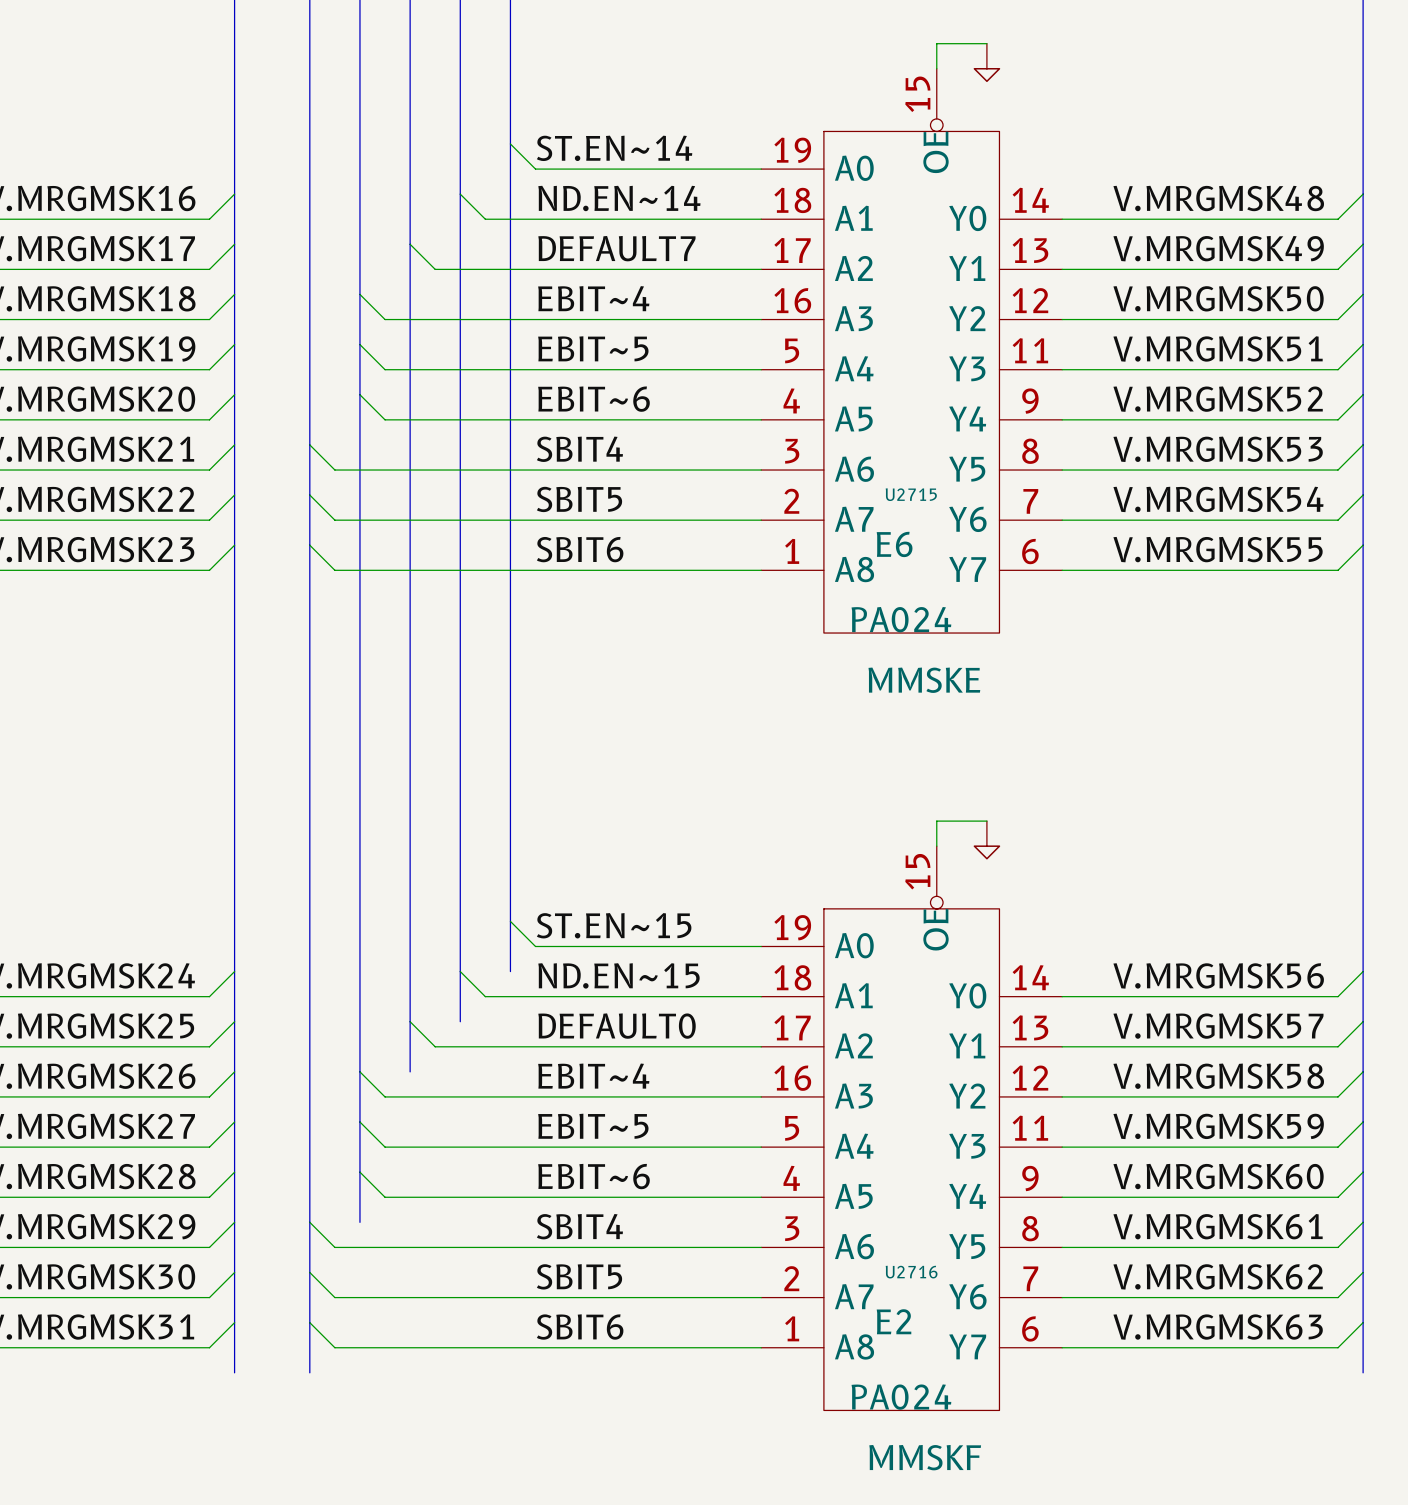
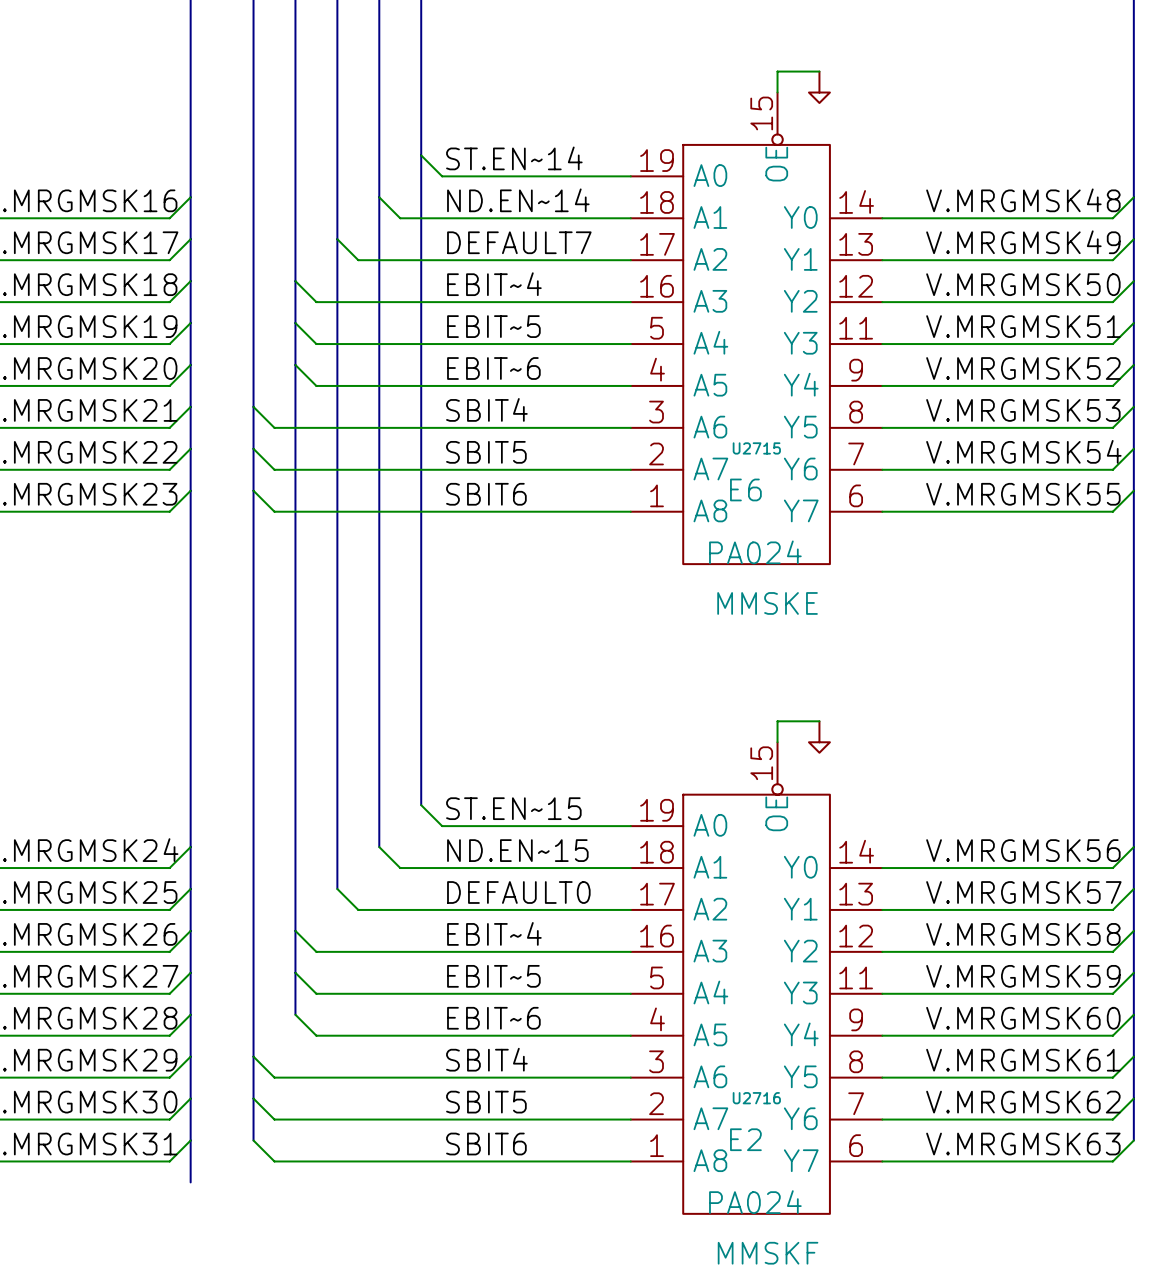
bus: (510, 921) (510, 971) -> none
bus: (460, 971) (460, 1021) -> none
bus: (410, 1021) (410, 1071) -> none
bus: (359, 1172) (359, 1222) -> none
bus: (309, 1322) (309, 1372) -> none
bus: (1363, 1322) (1363, 1372) -> none

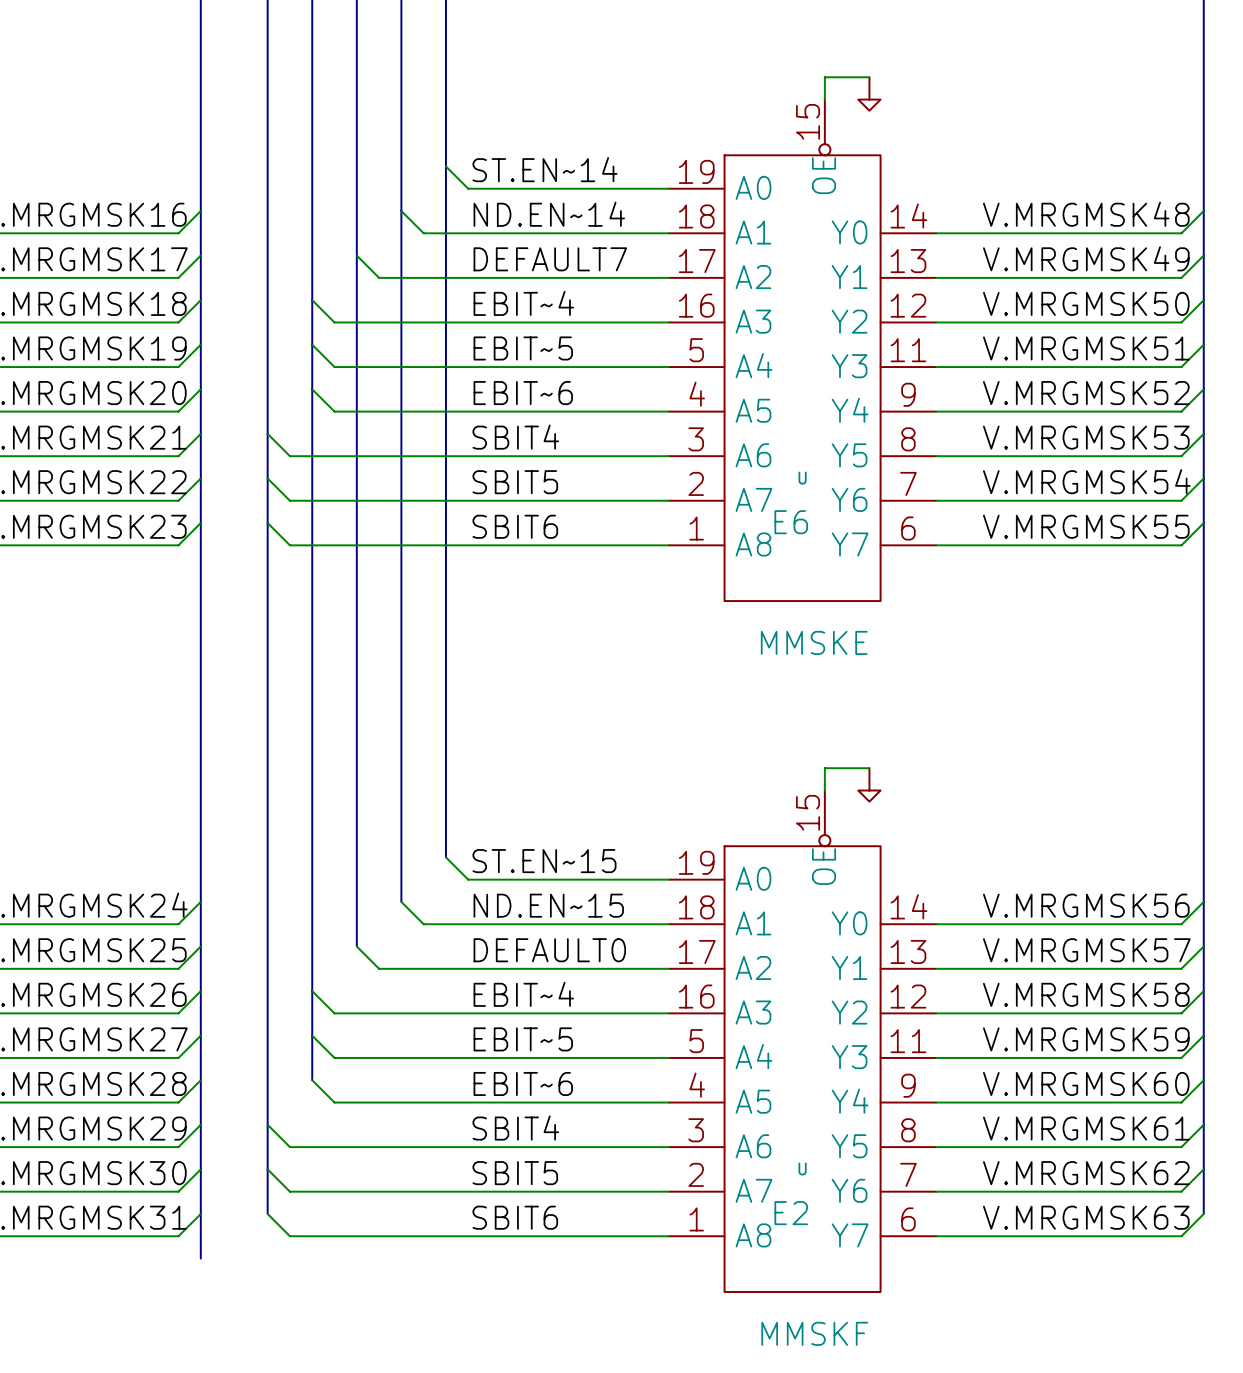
U2715 name: U2715 (756, 448) -> U (802, 478)
U2715 value: PA024 (755, 552) -> none
U2716 name: U2716 (756, 1098) -> U (802, 1168)
U2716 value: PA024 (755, 1202) -> none

